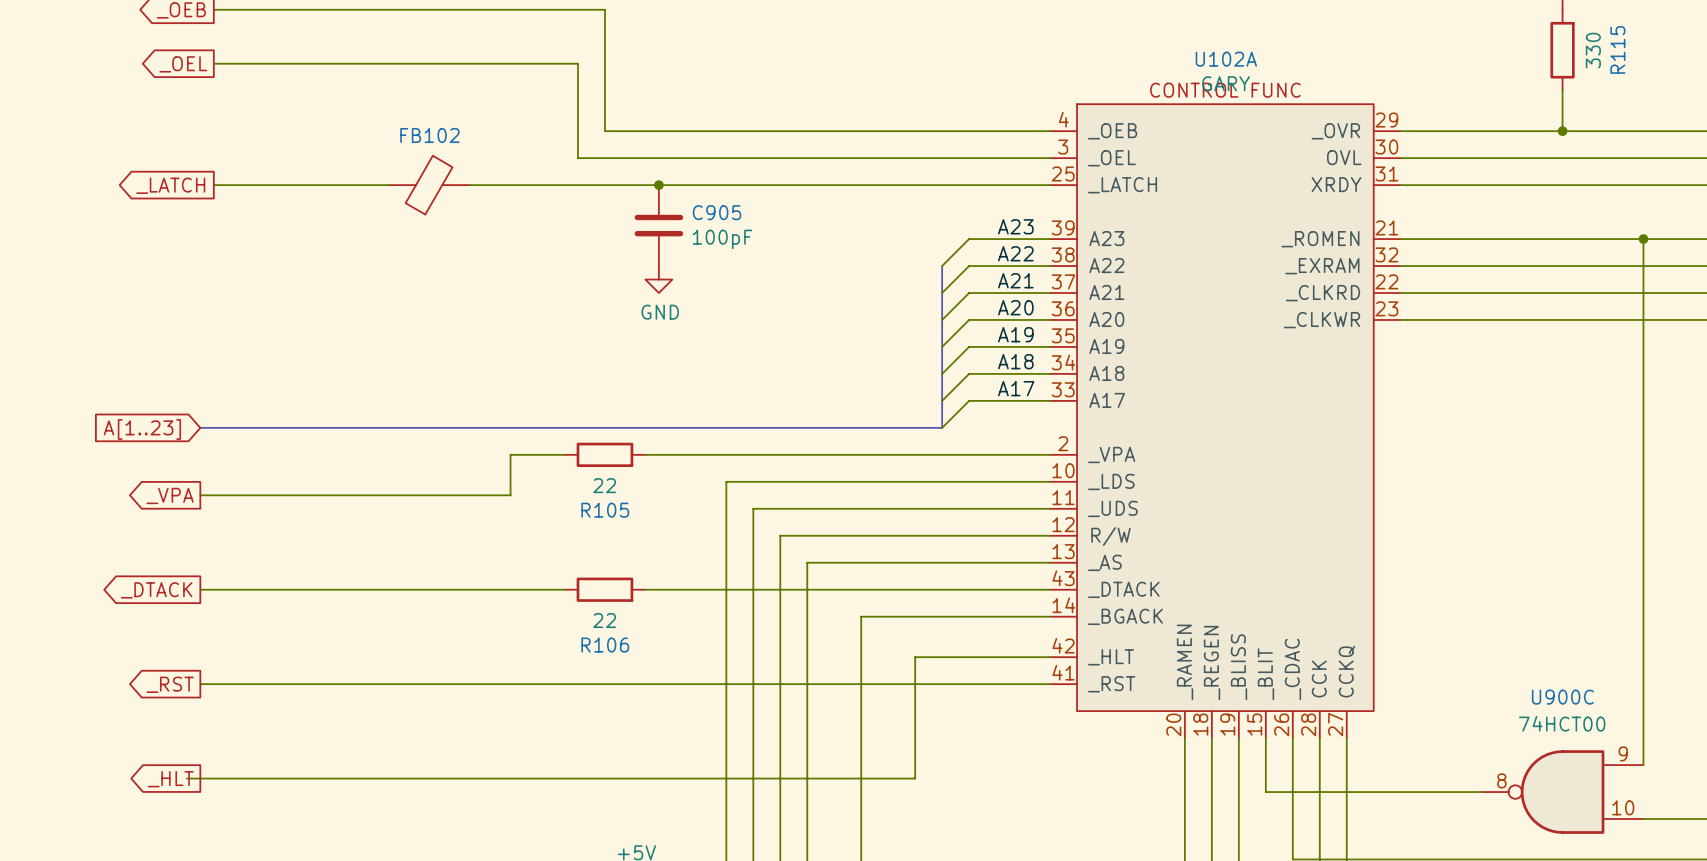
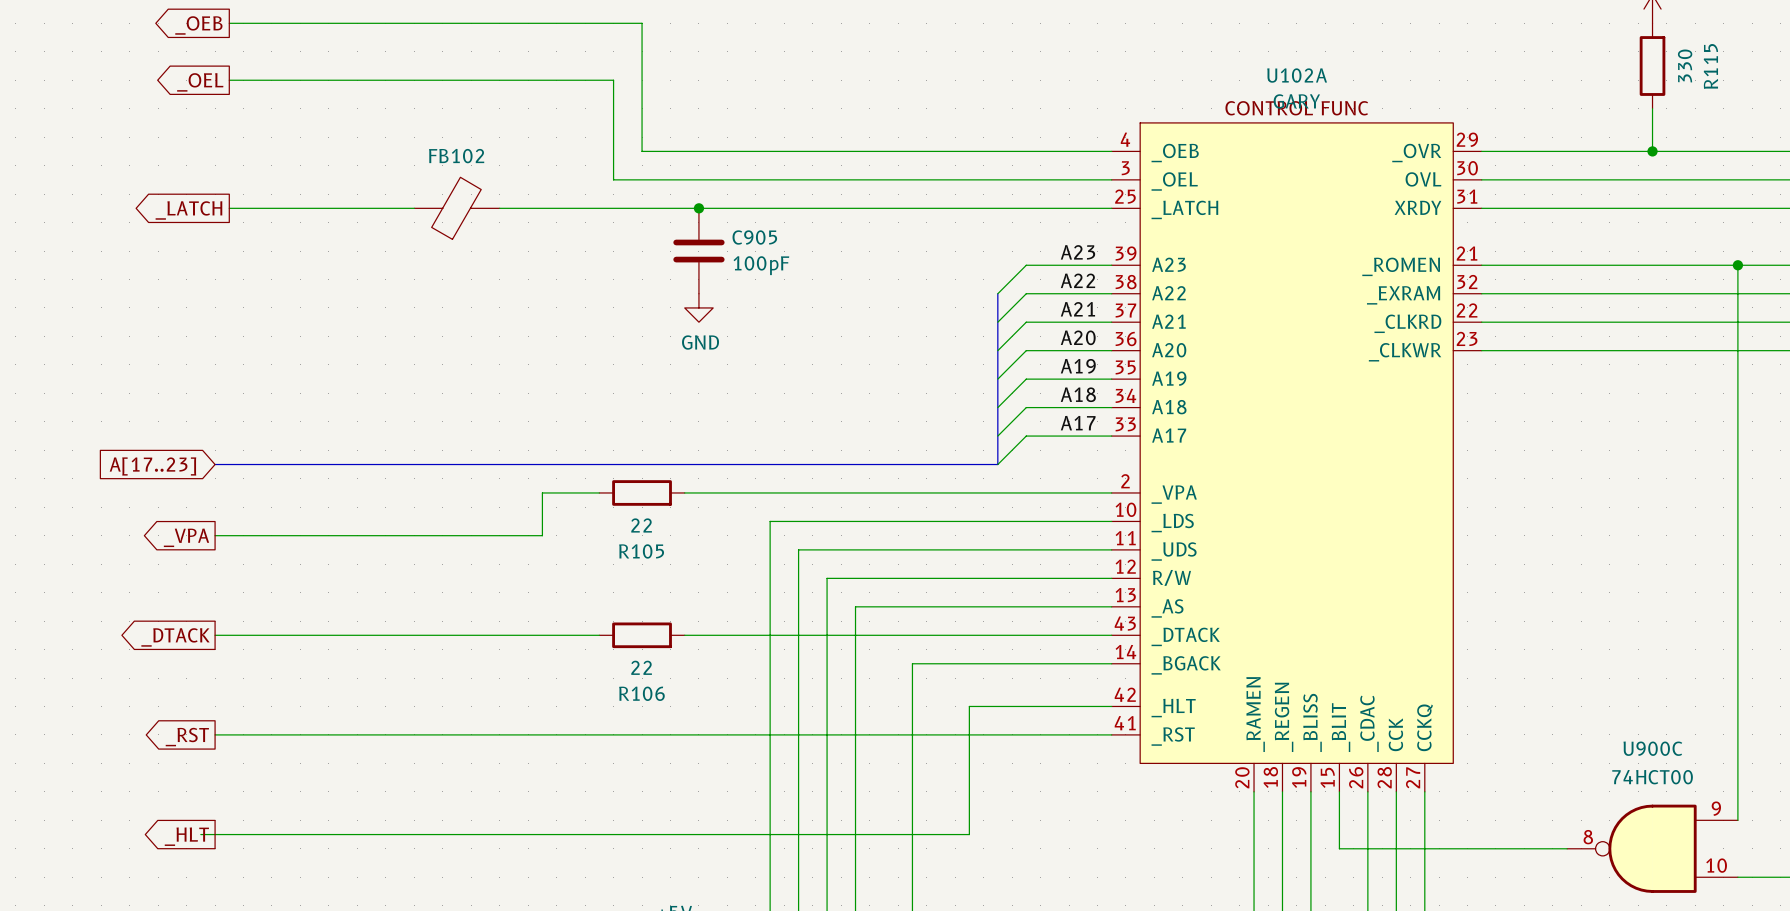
global label: A[1..23] (142, 429) -> A[17..23] (152, 466)

